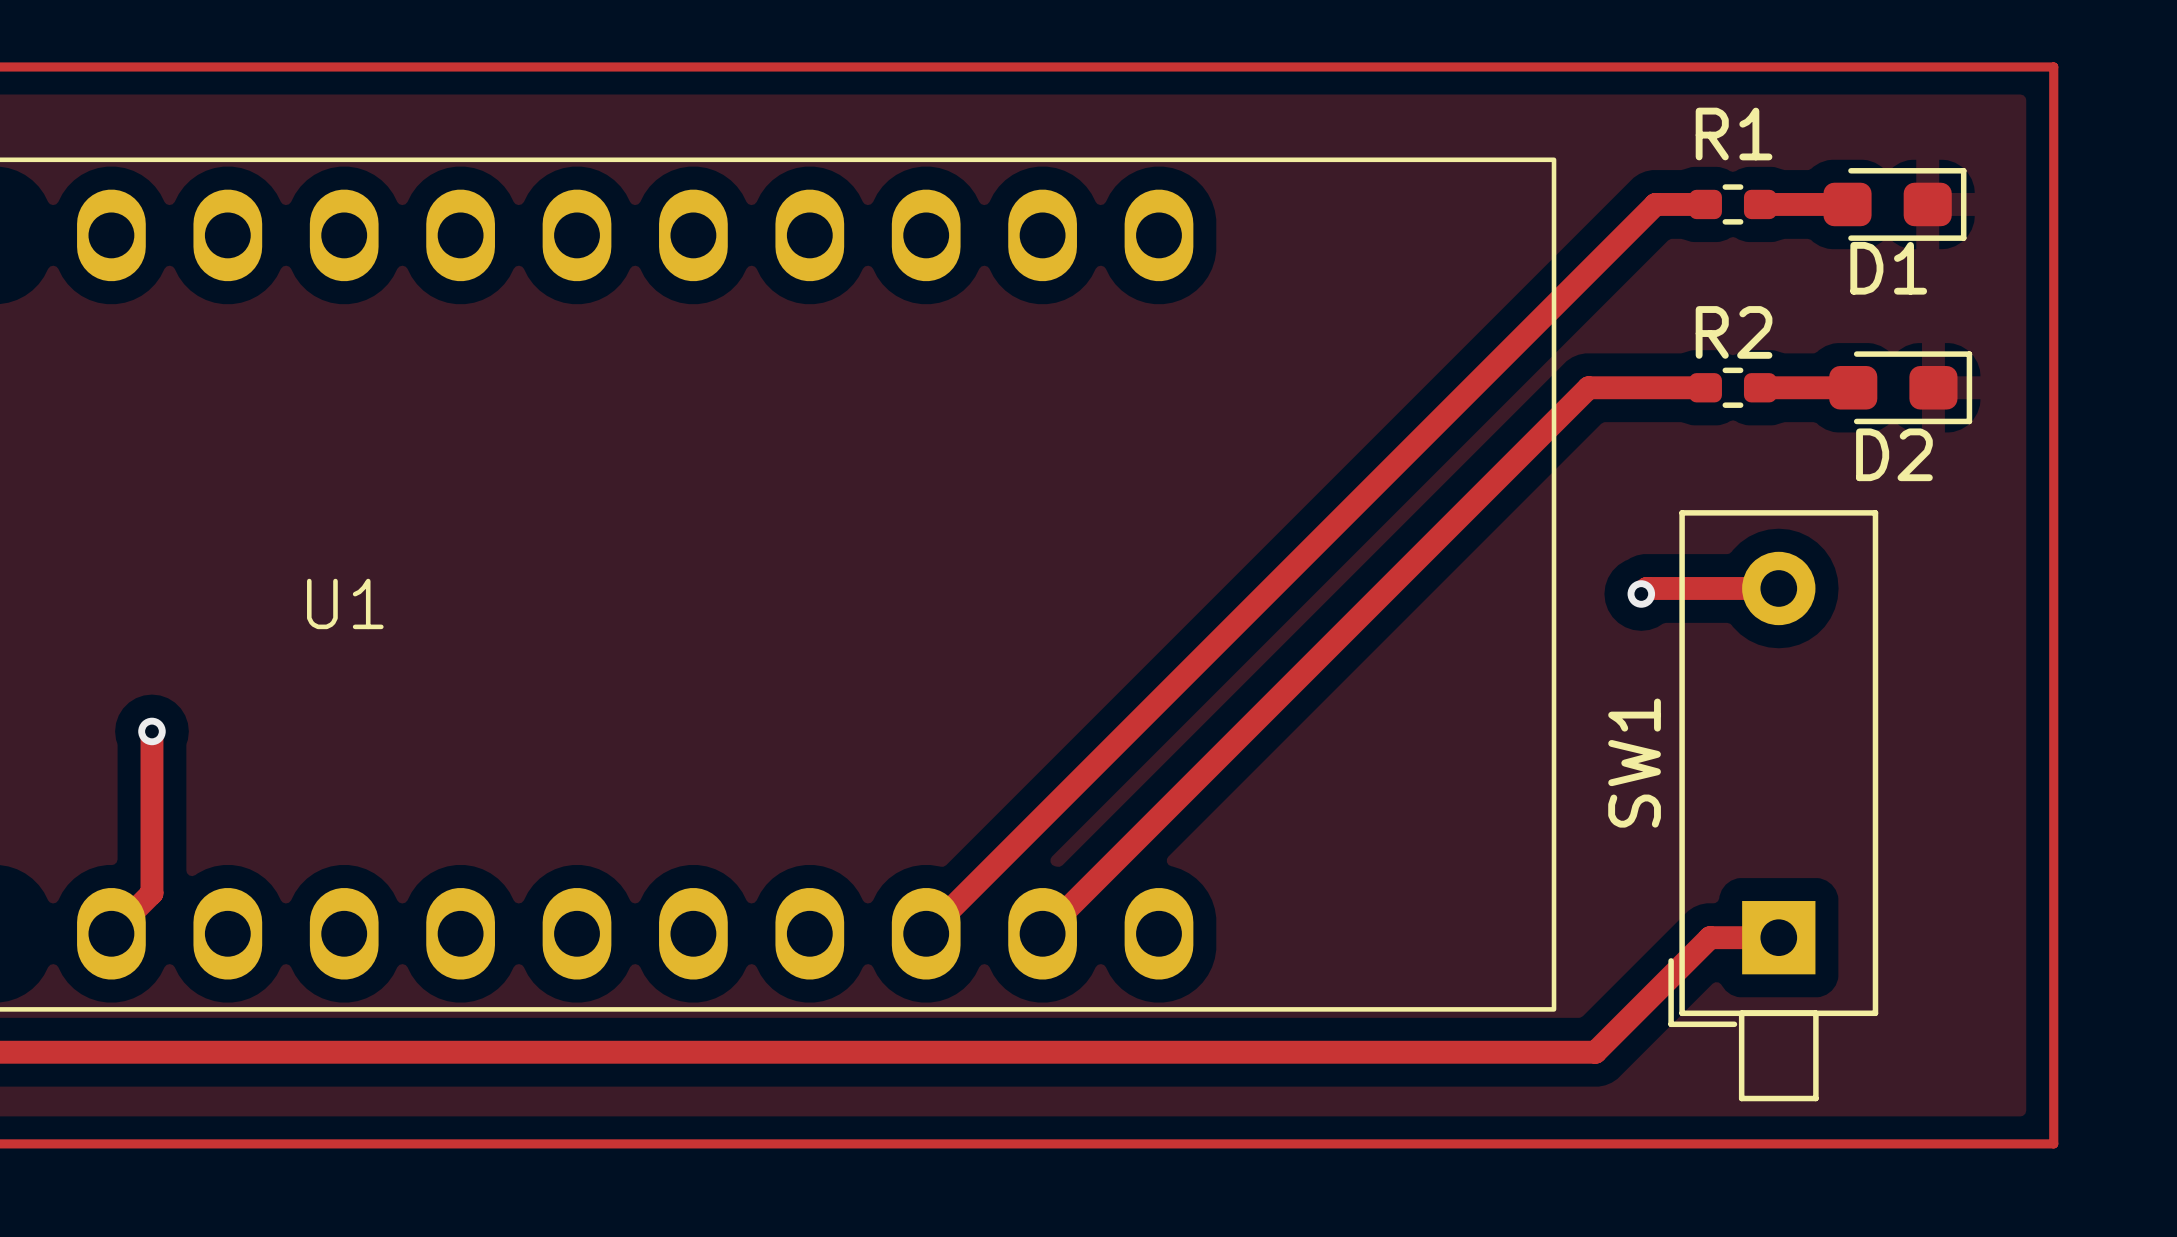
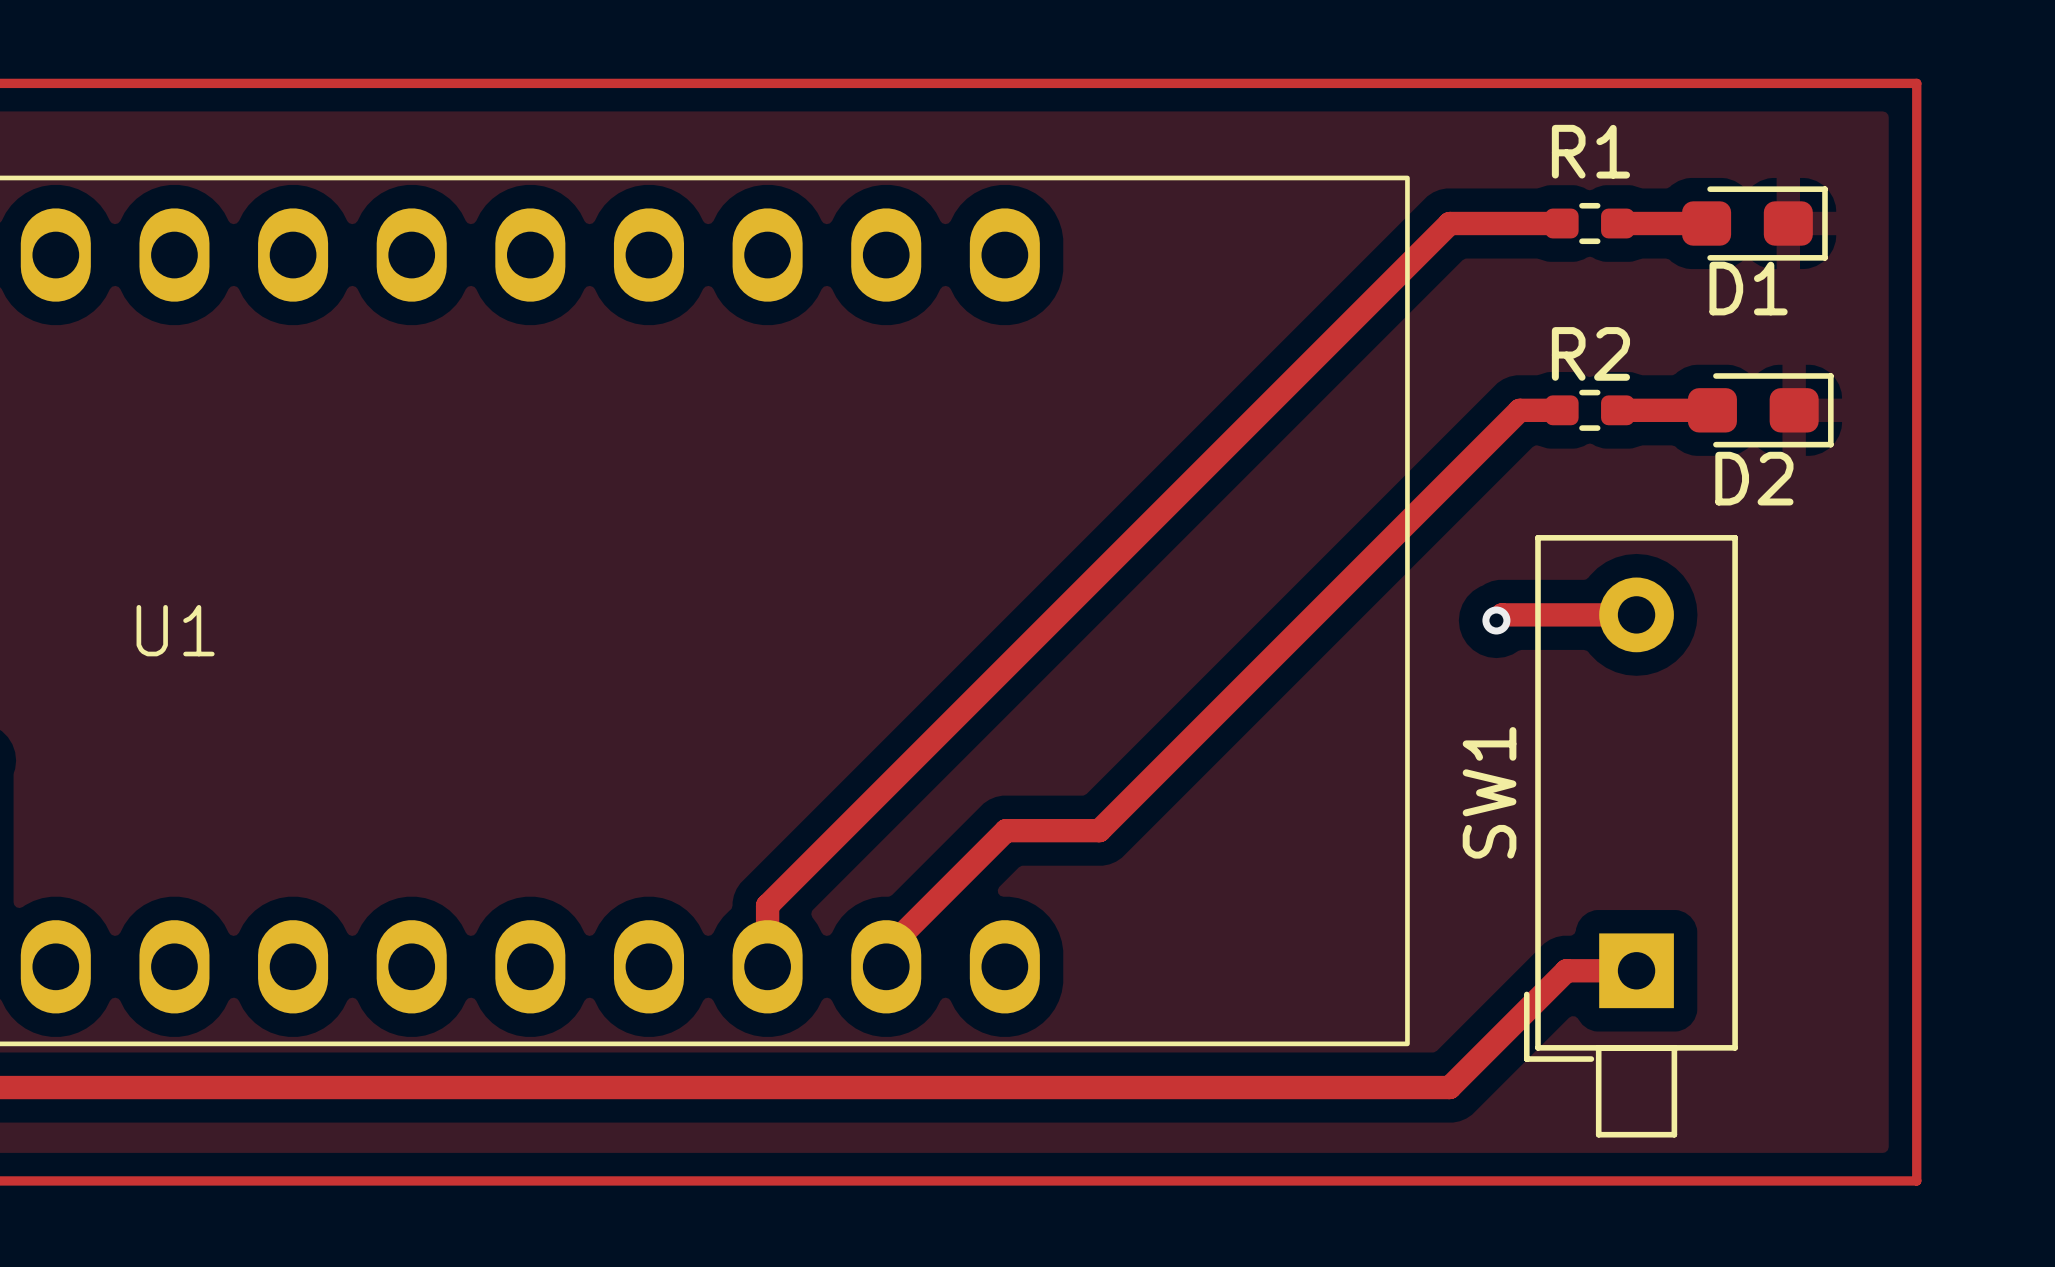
track: (1655, 204) (926, 933) -> (1510, 223) (1449, 223) (767, 905) (767, 966)
track: (1664, 387) (1588, 387) (1042, 933) -> (1519, 410) (1099, 830) (1006, 830) (886, 950) (886, 966)

